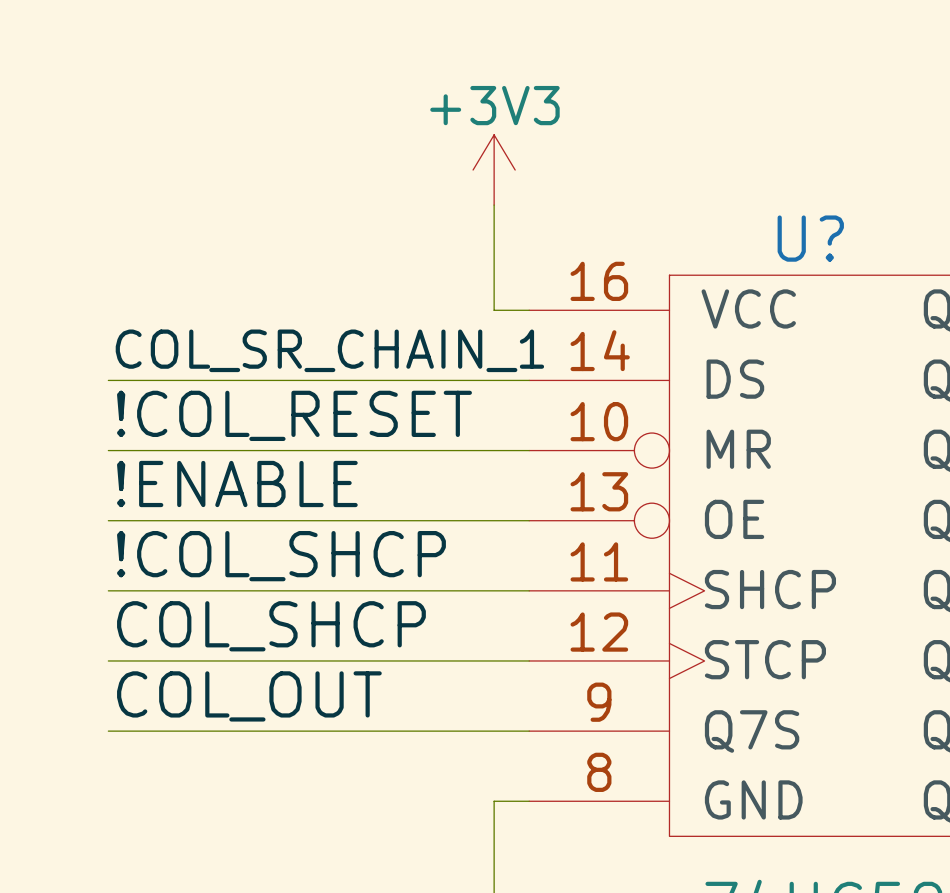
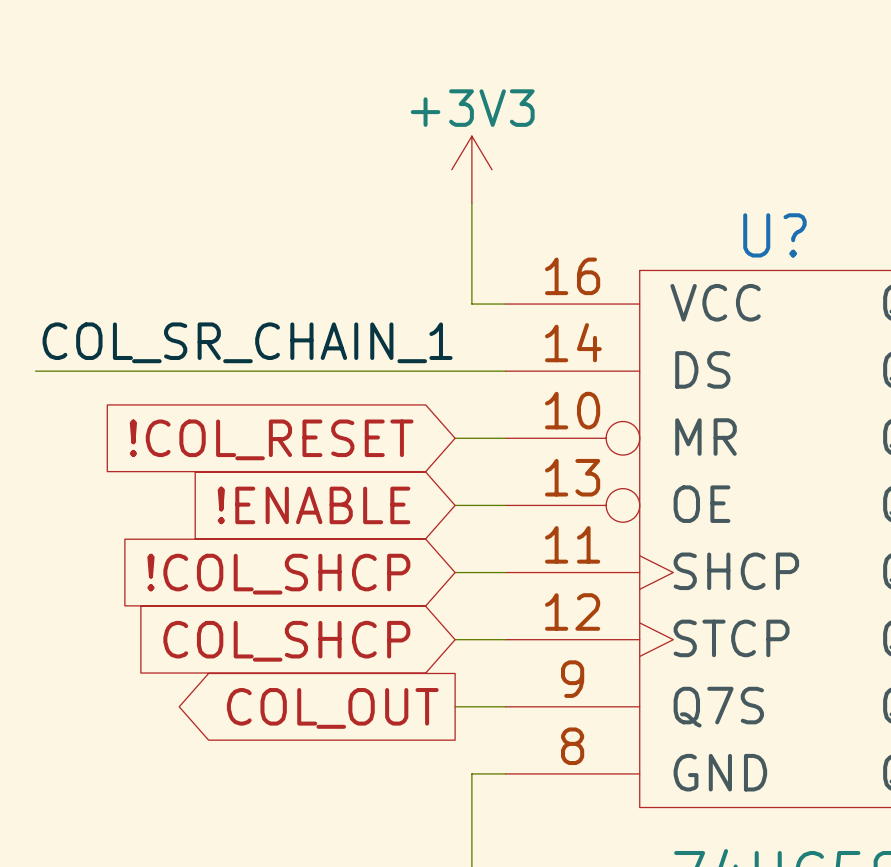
label position: COL_SR_CHAIN_1 (329, 350) -> COL_SR_CHAIN_1 (247, 342)
wire: none -> (35, 371) (102, 371)
label: !COL_RESET (294, 415) -> none
wire: (108, 450) (476, 450) -> none
global label: none -> !COL_RESET (271, 439)
label: !ENABLE (237, 483) -> none
wire: (108, 520) (476, 520) -> none
global label: none -> !ENABLE (314, 505)
label: !COL_SHCP (281, 556) -> none
wire: (108, 590) (476, 590) -> none
global label: none -> !COL_SHCP (278, 574)
label: COL_SHCP (271, 626) -> none
wire: (108, 660) (476, 660) -> none
global label: none -> COL_SHCP (286, 641)
label: COL_OUT (249, 696) -> none
wire: (108, 731) (476, 731) -> none
global label: none -> COL_OUT (332, 708)

